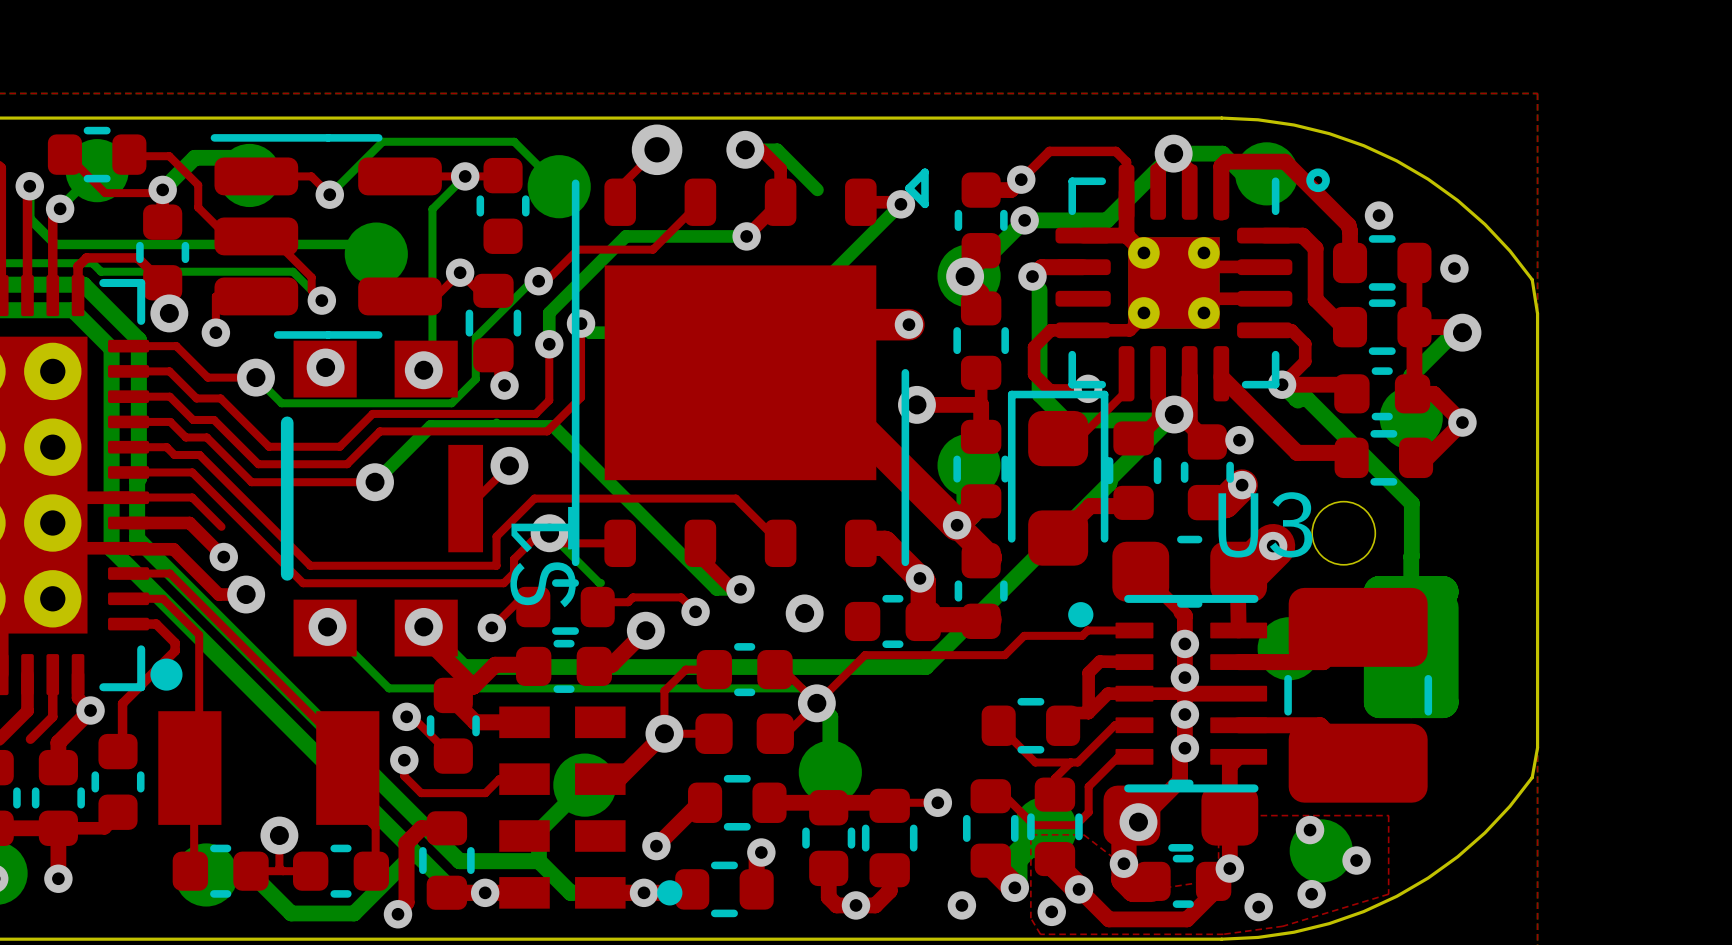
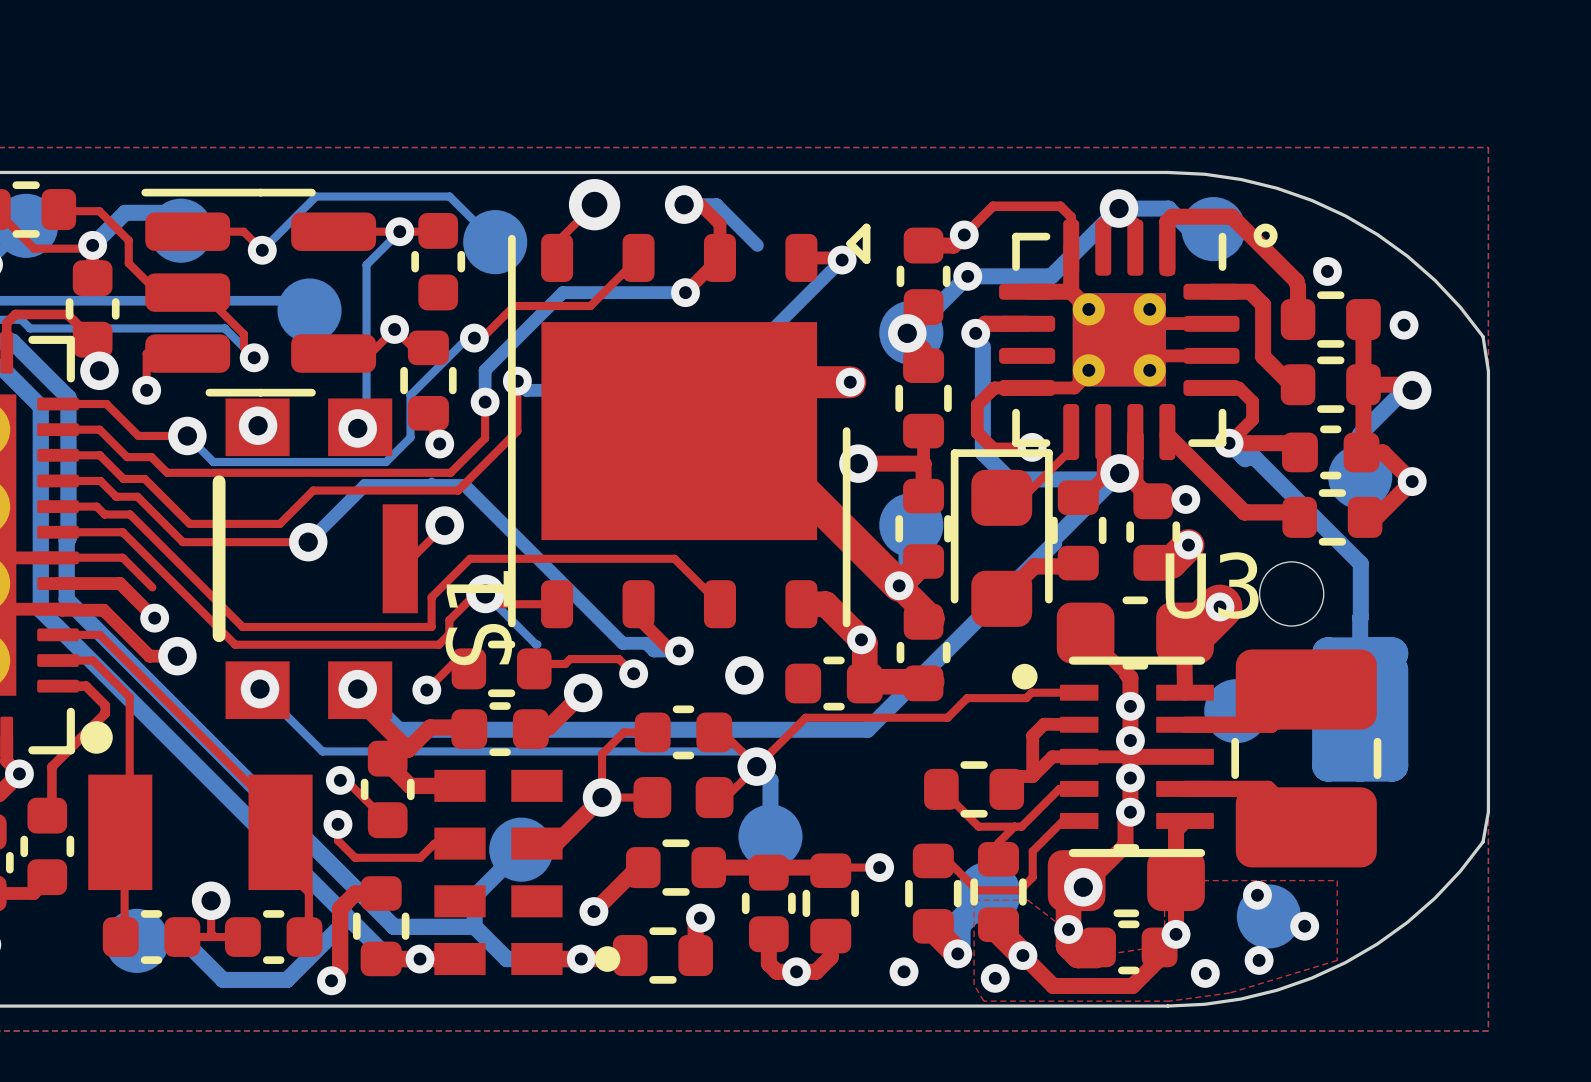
top track: (581, 372) (581, 397) (547, 431) (522, 431) -> (517, 431) (458, 490)
top track: (549, 379) (549, 400) (535, 413) (515, 413) -> (485, 438) (450, 472)
top track: (236, 413) (268, 446) (339, 446) (372, 413) -> (167, 472) (305, 472)
bottom track: (529, 426) (553, 426) (716, 589) -> (464, 485) (622, 643) (646, 643) (653, 650)

